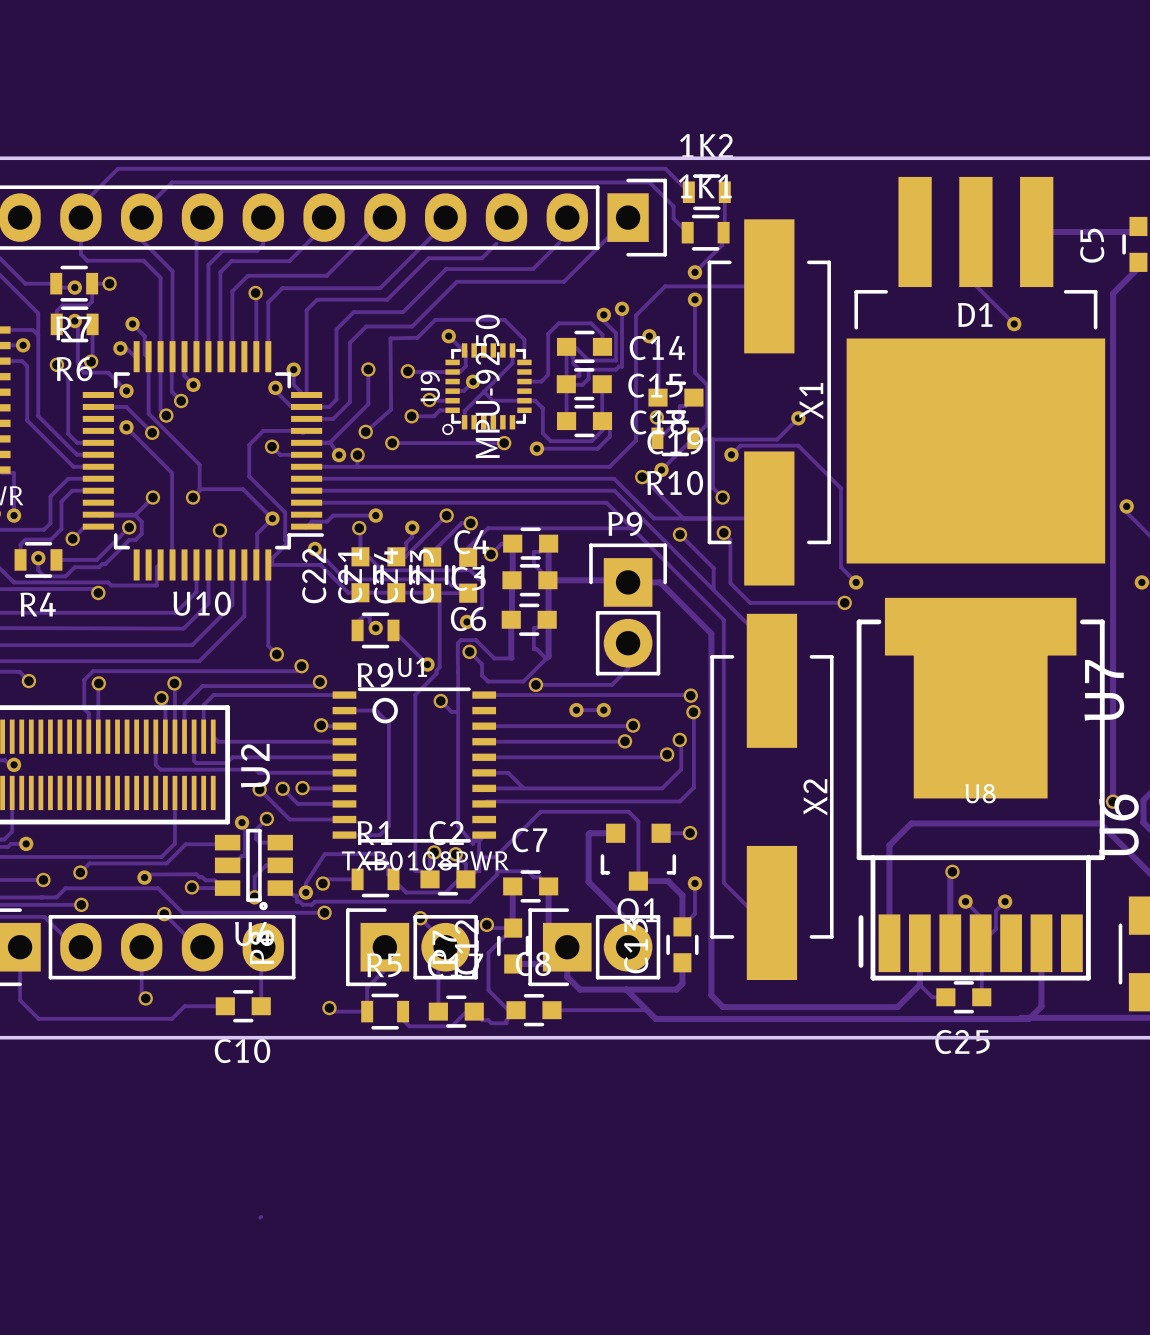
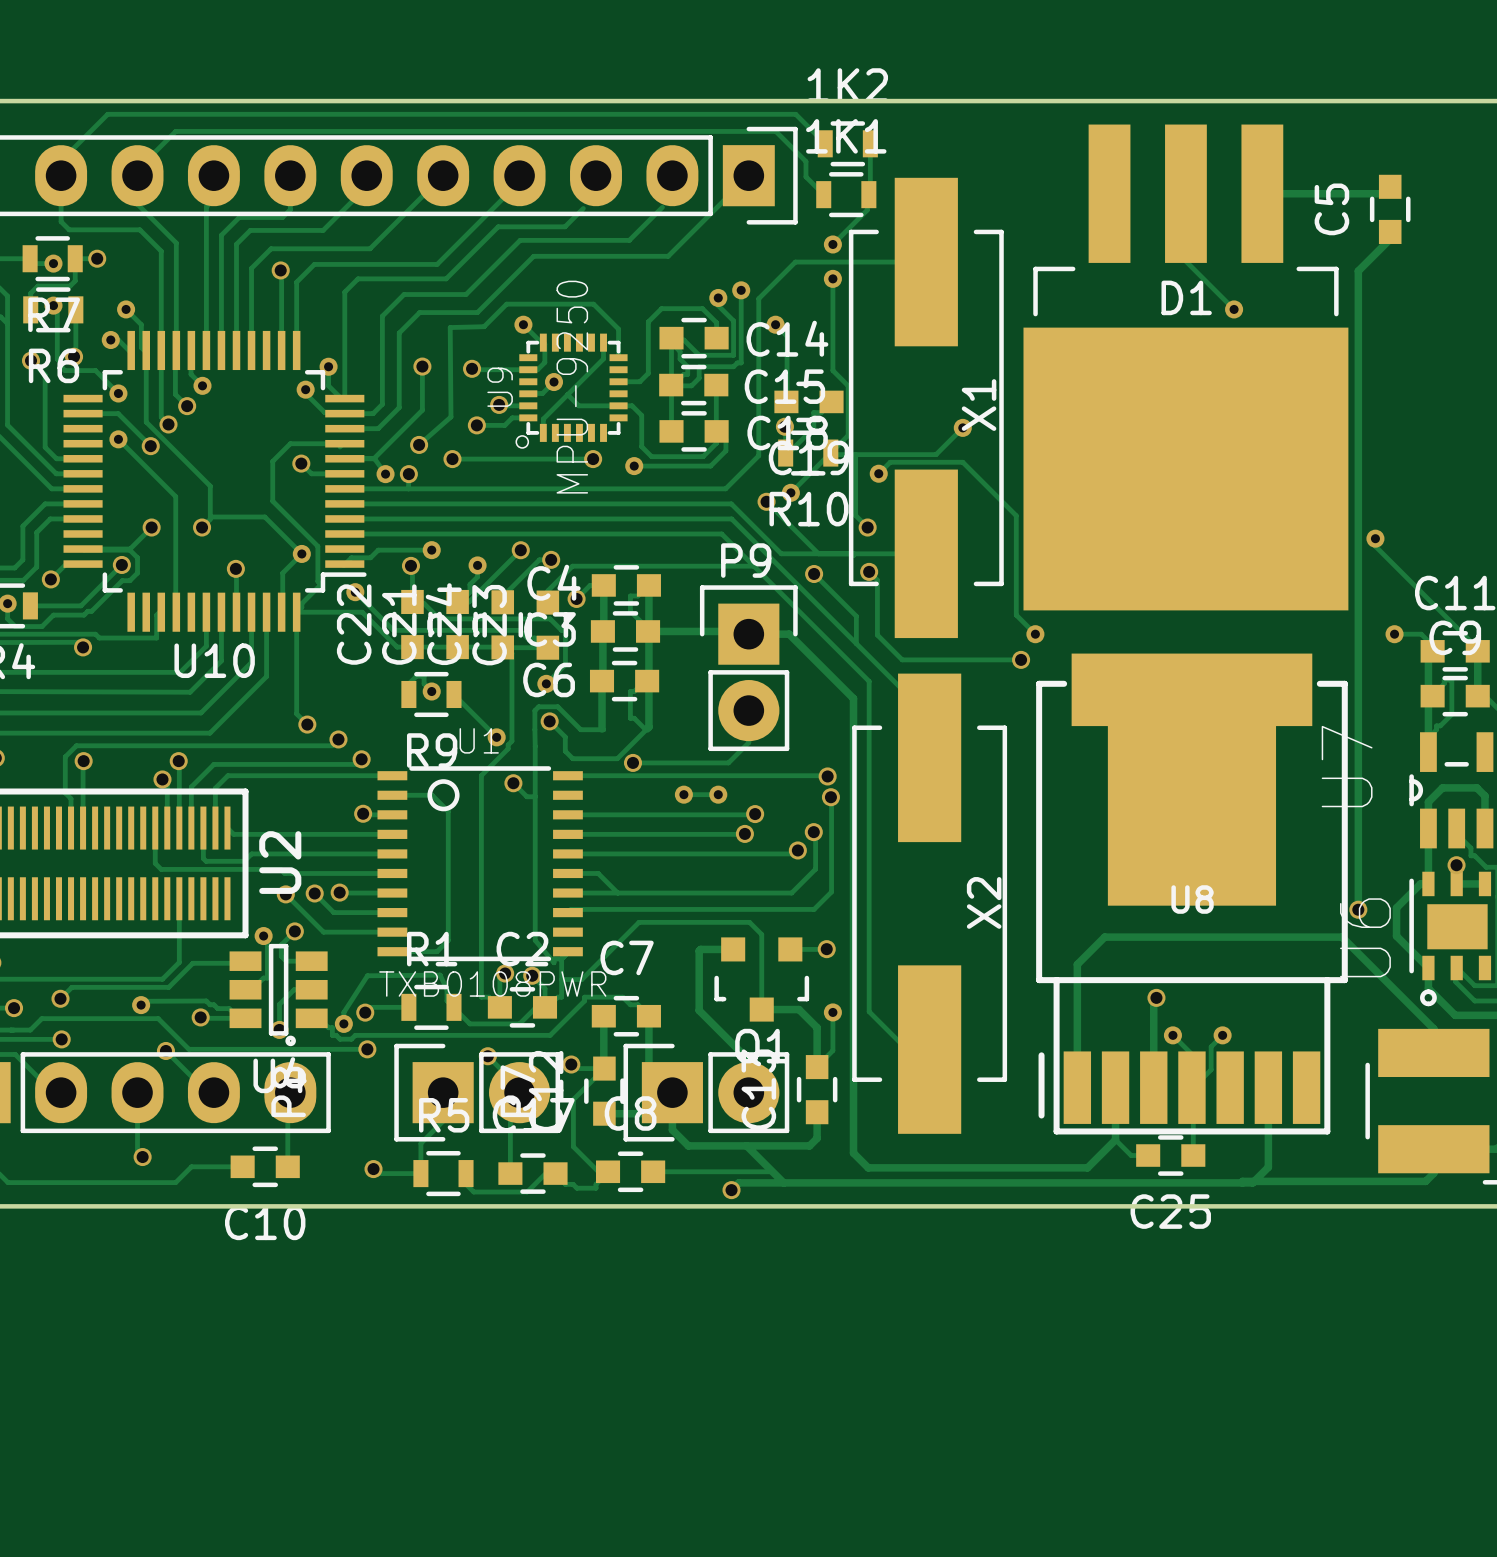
track: none -> (783, 1182) (738, 1182) (731, 1190)
via: none -> (731, 1190)
track: (261, 1216) (260, 1217) -> none

